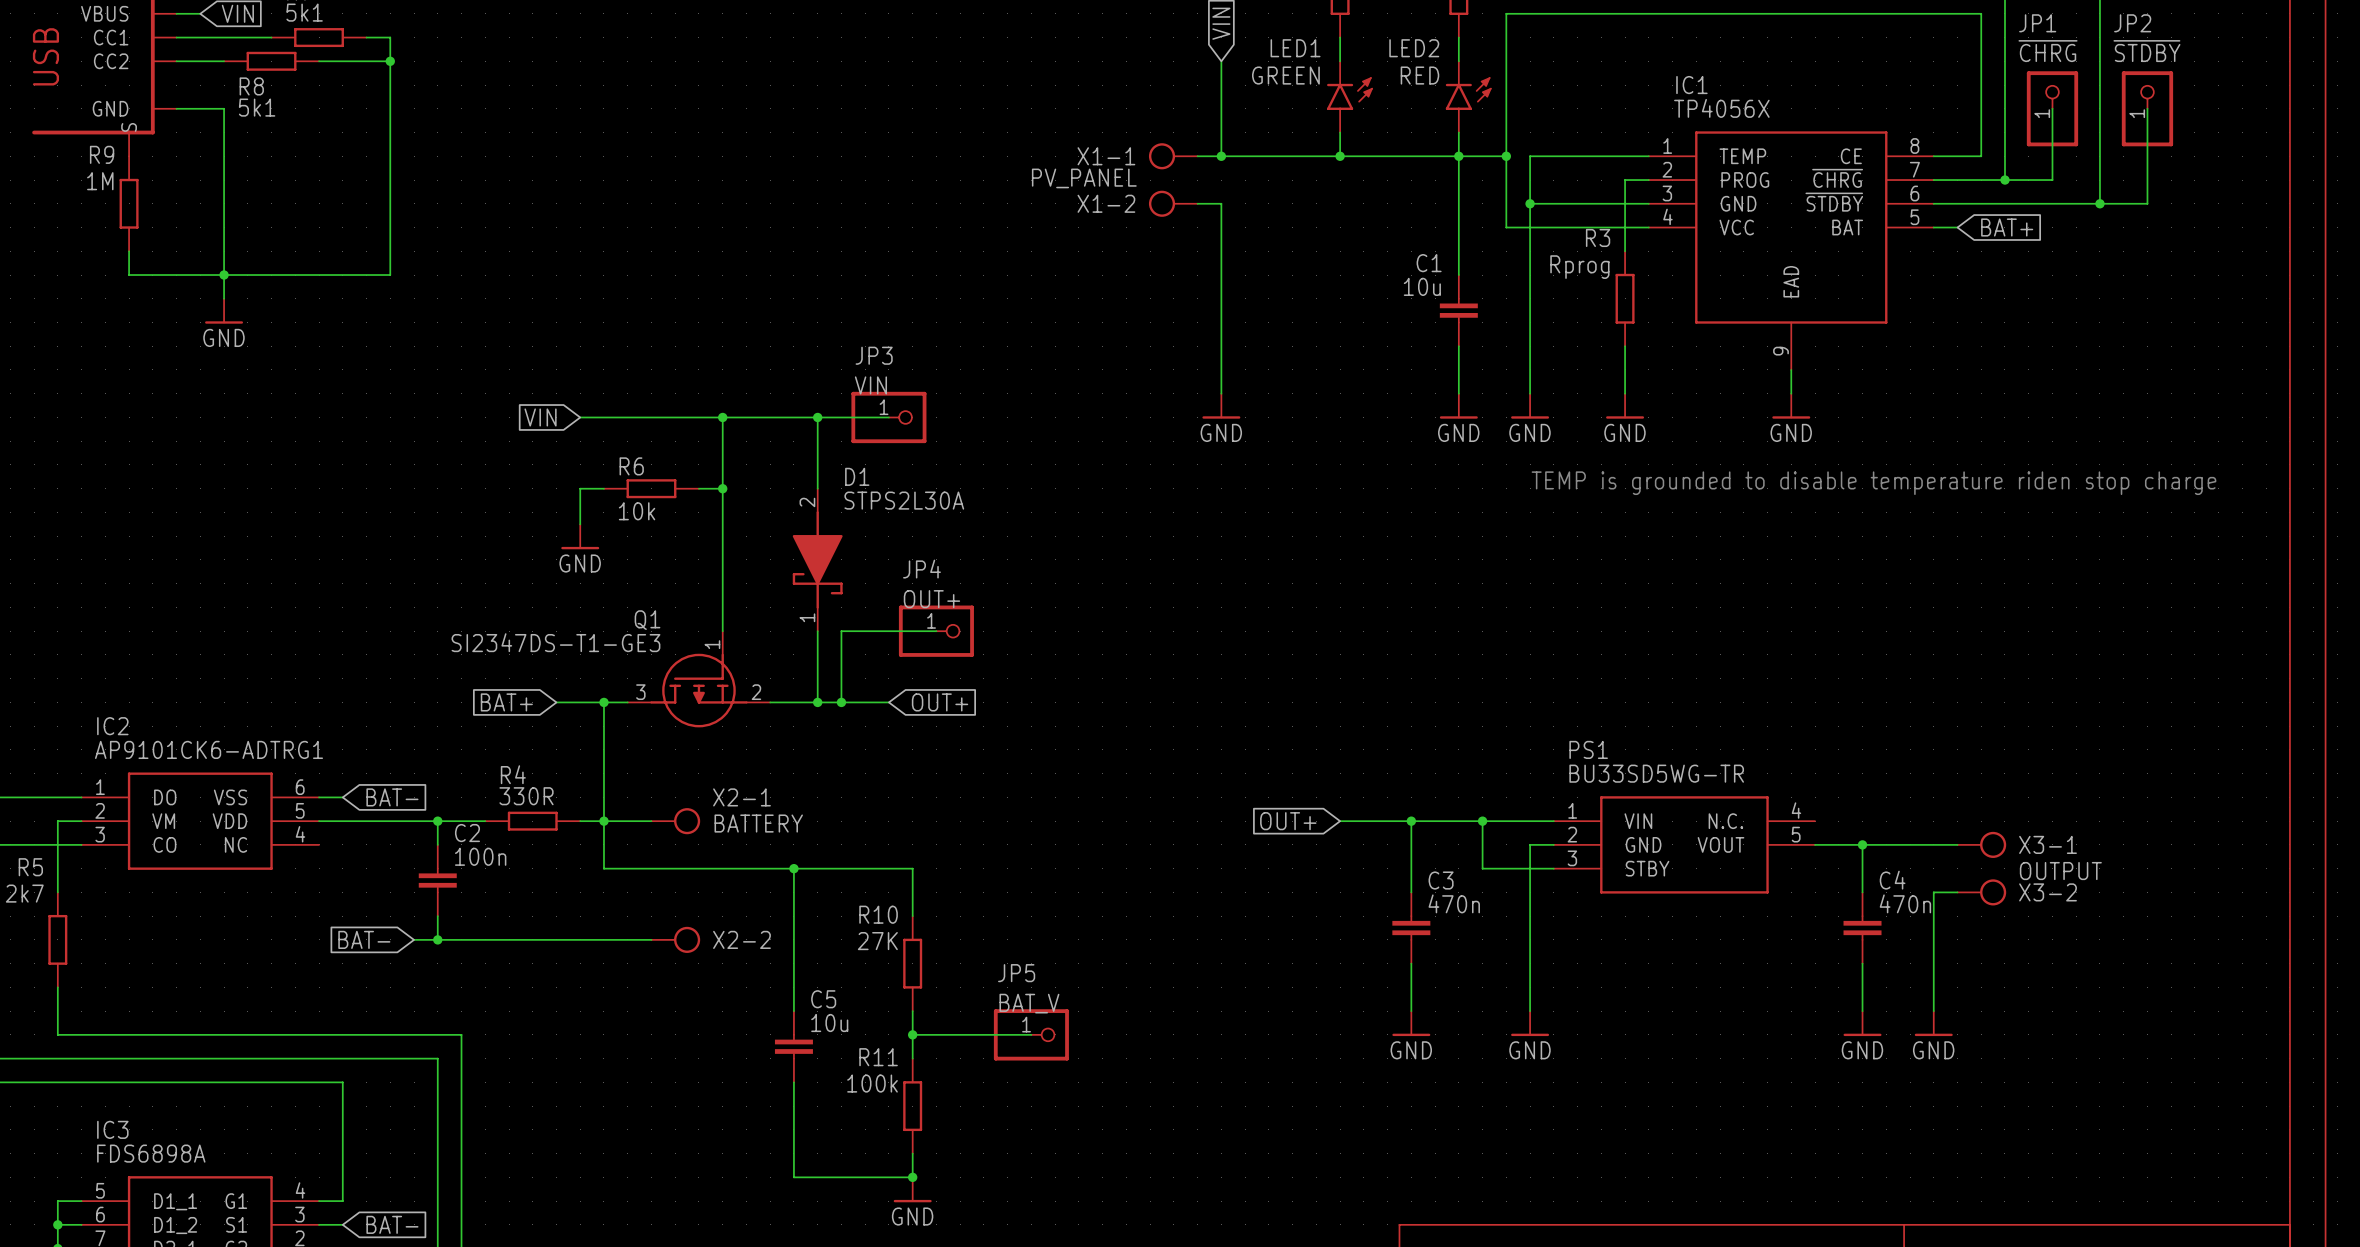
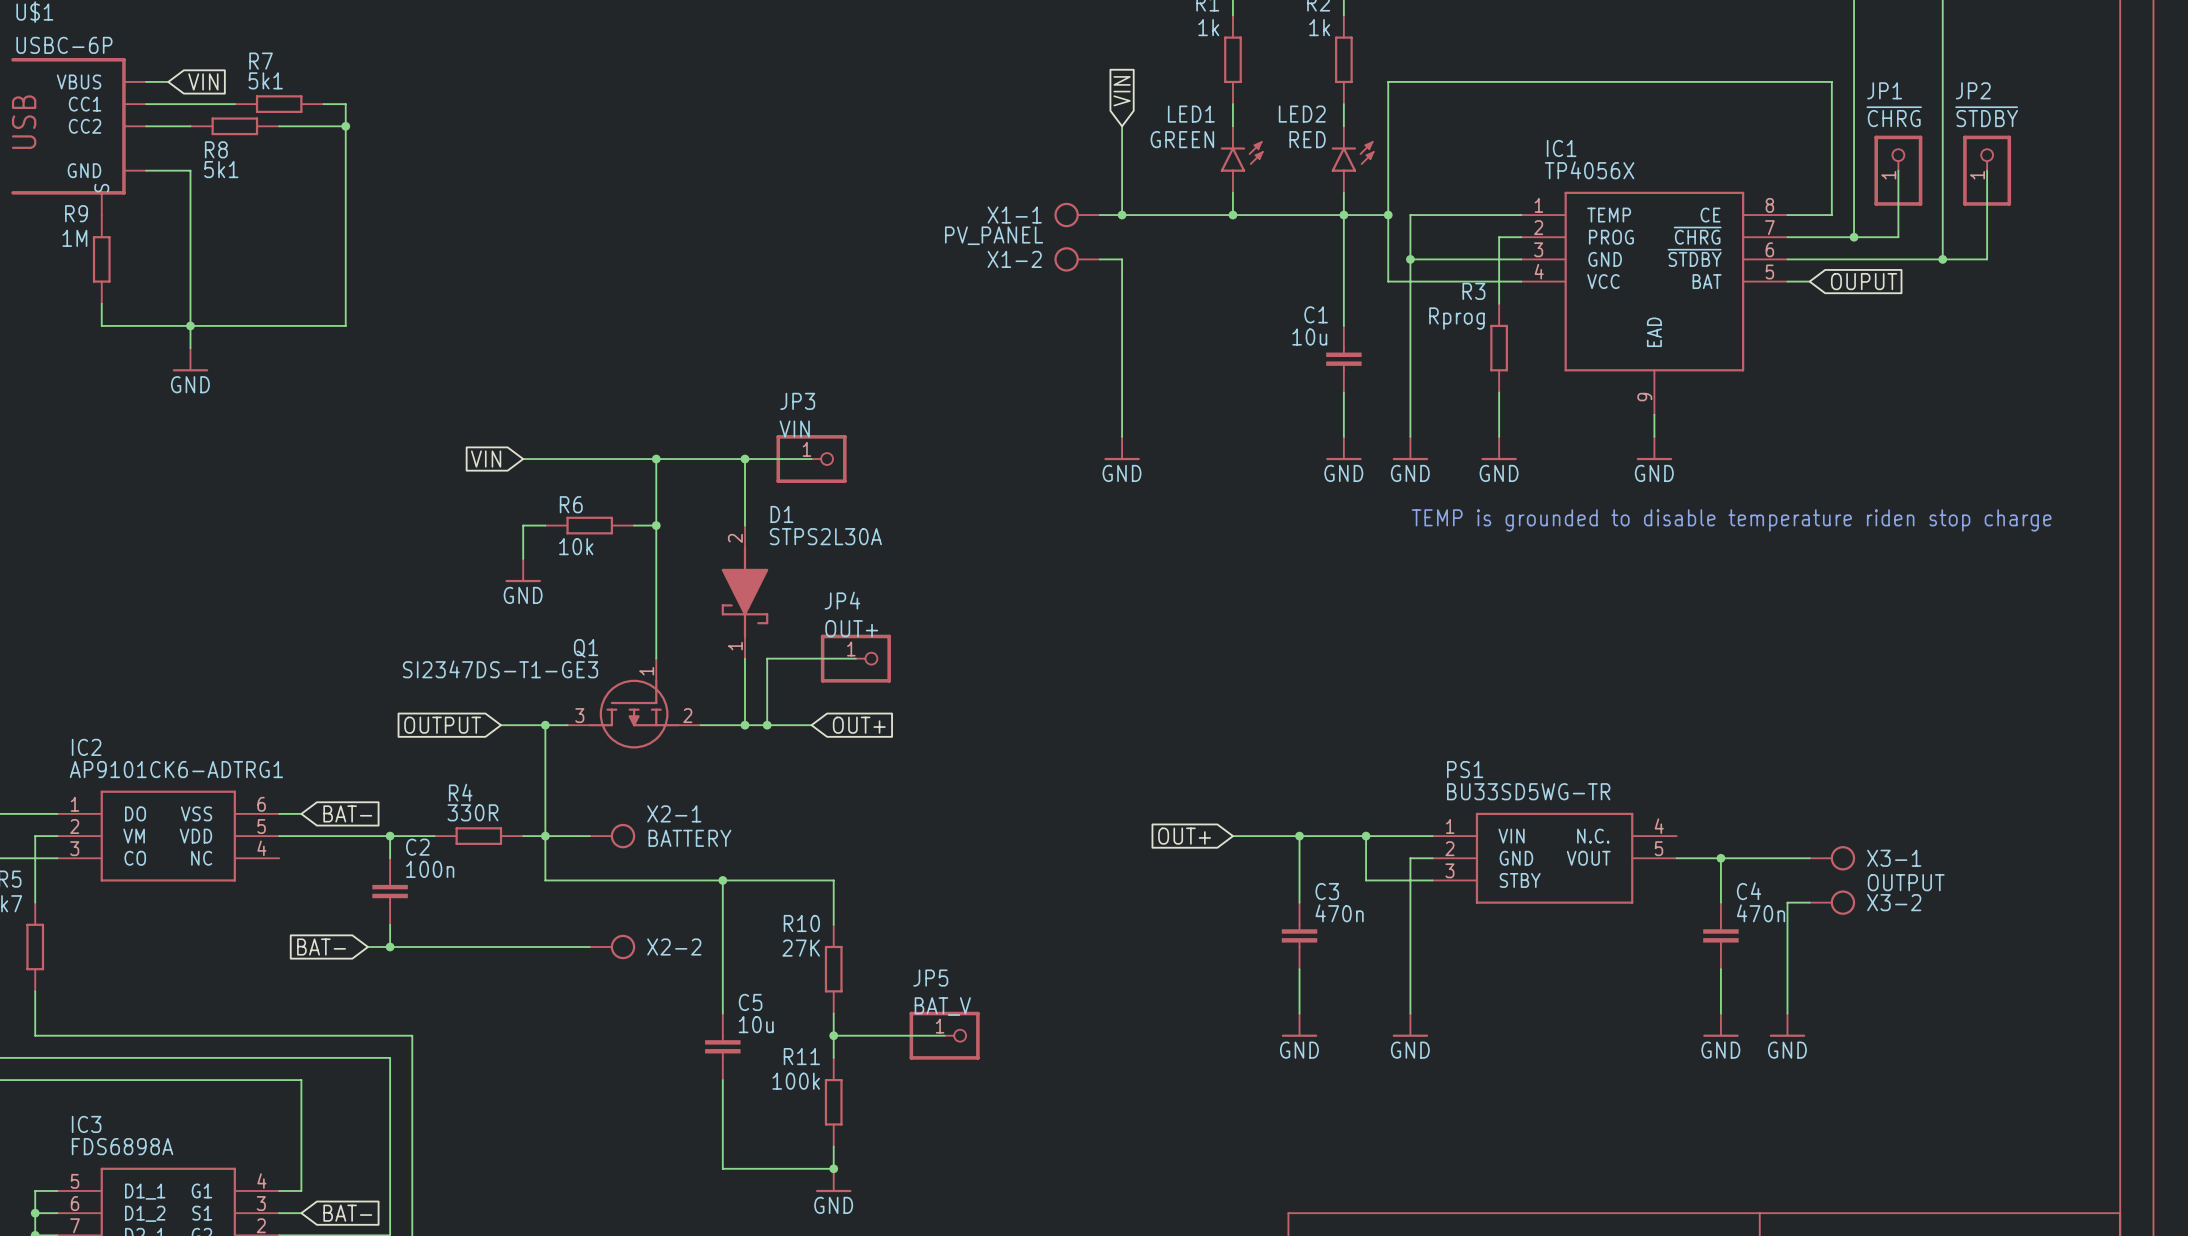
global label: BAT+ (2007, 227) -> OUPUT (1864, 281)
global label: BAT+ (506, 702) -> OUTPUT (442, 725)

